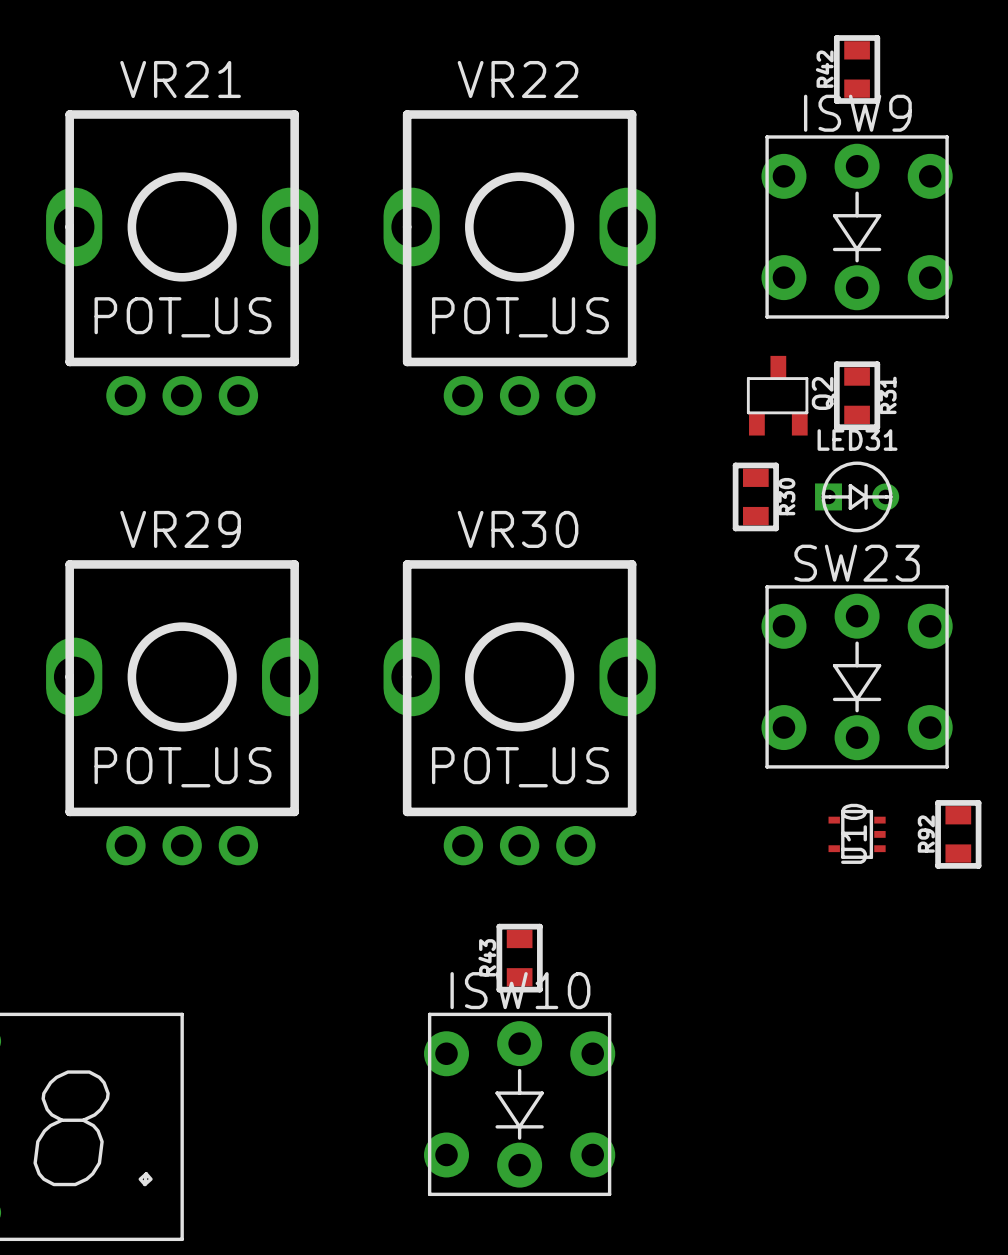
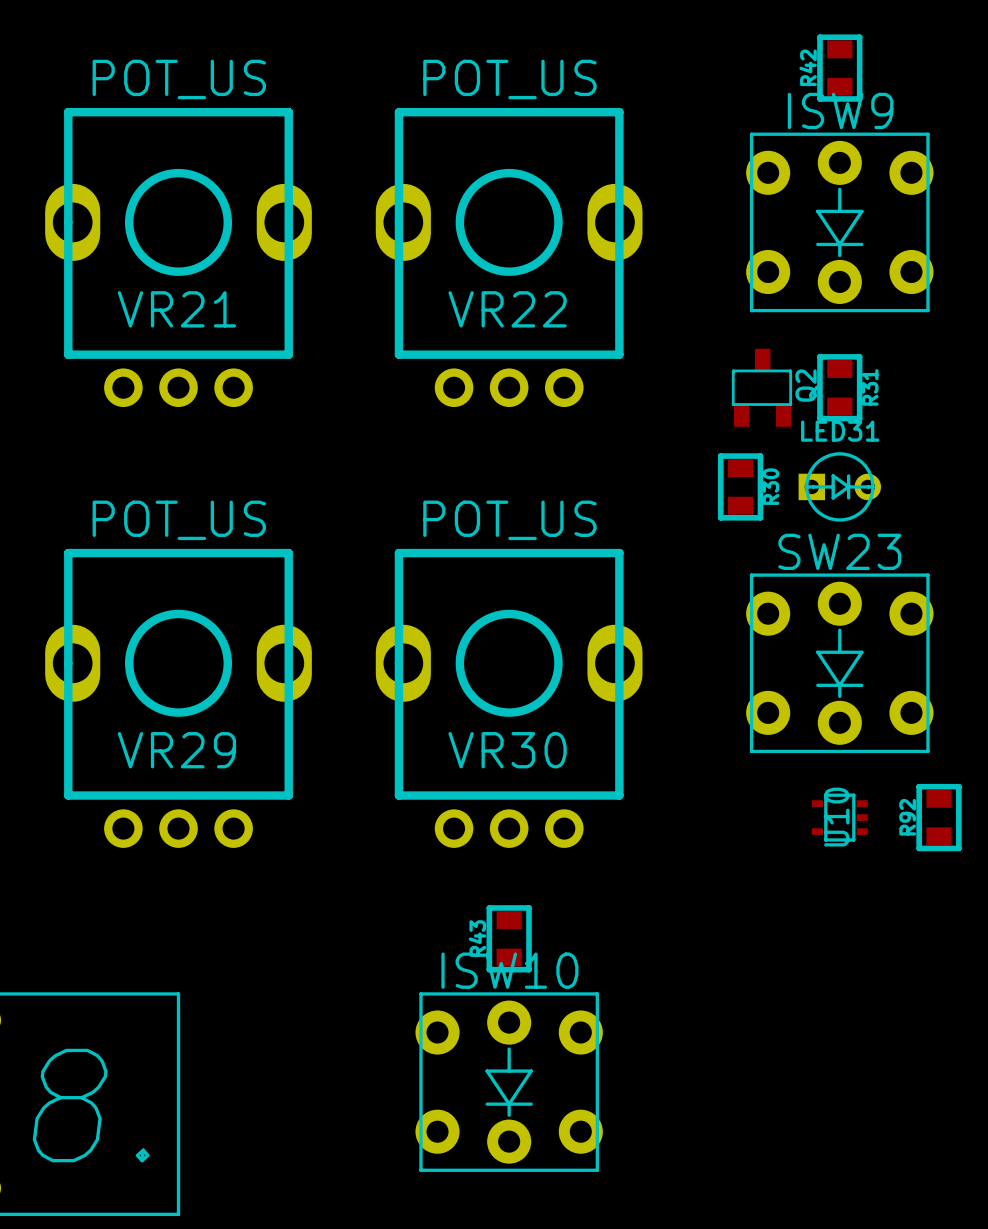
VR21 name position: VR21 (180, 79) -> VR21 (176, 309)
VR22 name position: VR22 (518, 79) -> VR22 (507, 309)
VR21 value position: POT_US (182, 317) -> POT_US (179, 79)
VR22 value position: POT_US (520, 317) -> POT_US (509, 79)
VR29 name position: VR29 (180, 529) -> VR29 (176, 750)
VR30 name position: VR30 (518, 529) -> VR30 (507, 750)
VR29 value position: POT_US (182, 767) -> POT_US (179, 520)
VR30 value position: POT_US (520, 767) -> POT_US (509, 520)

